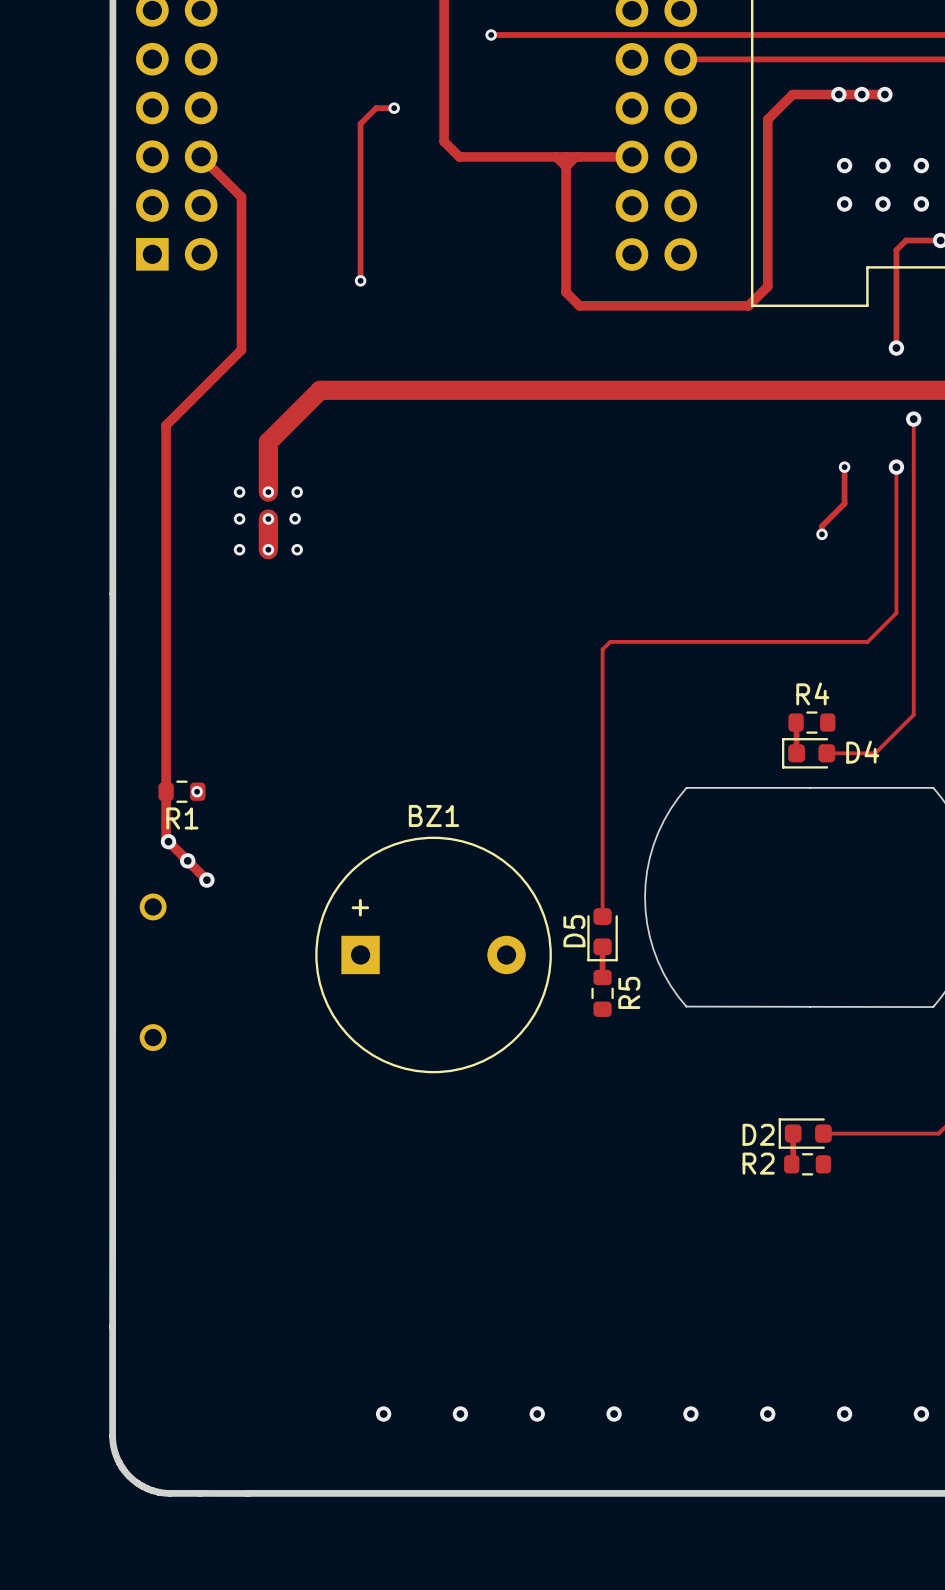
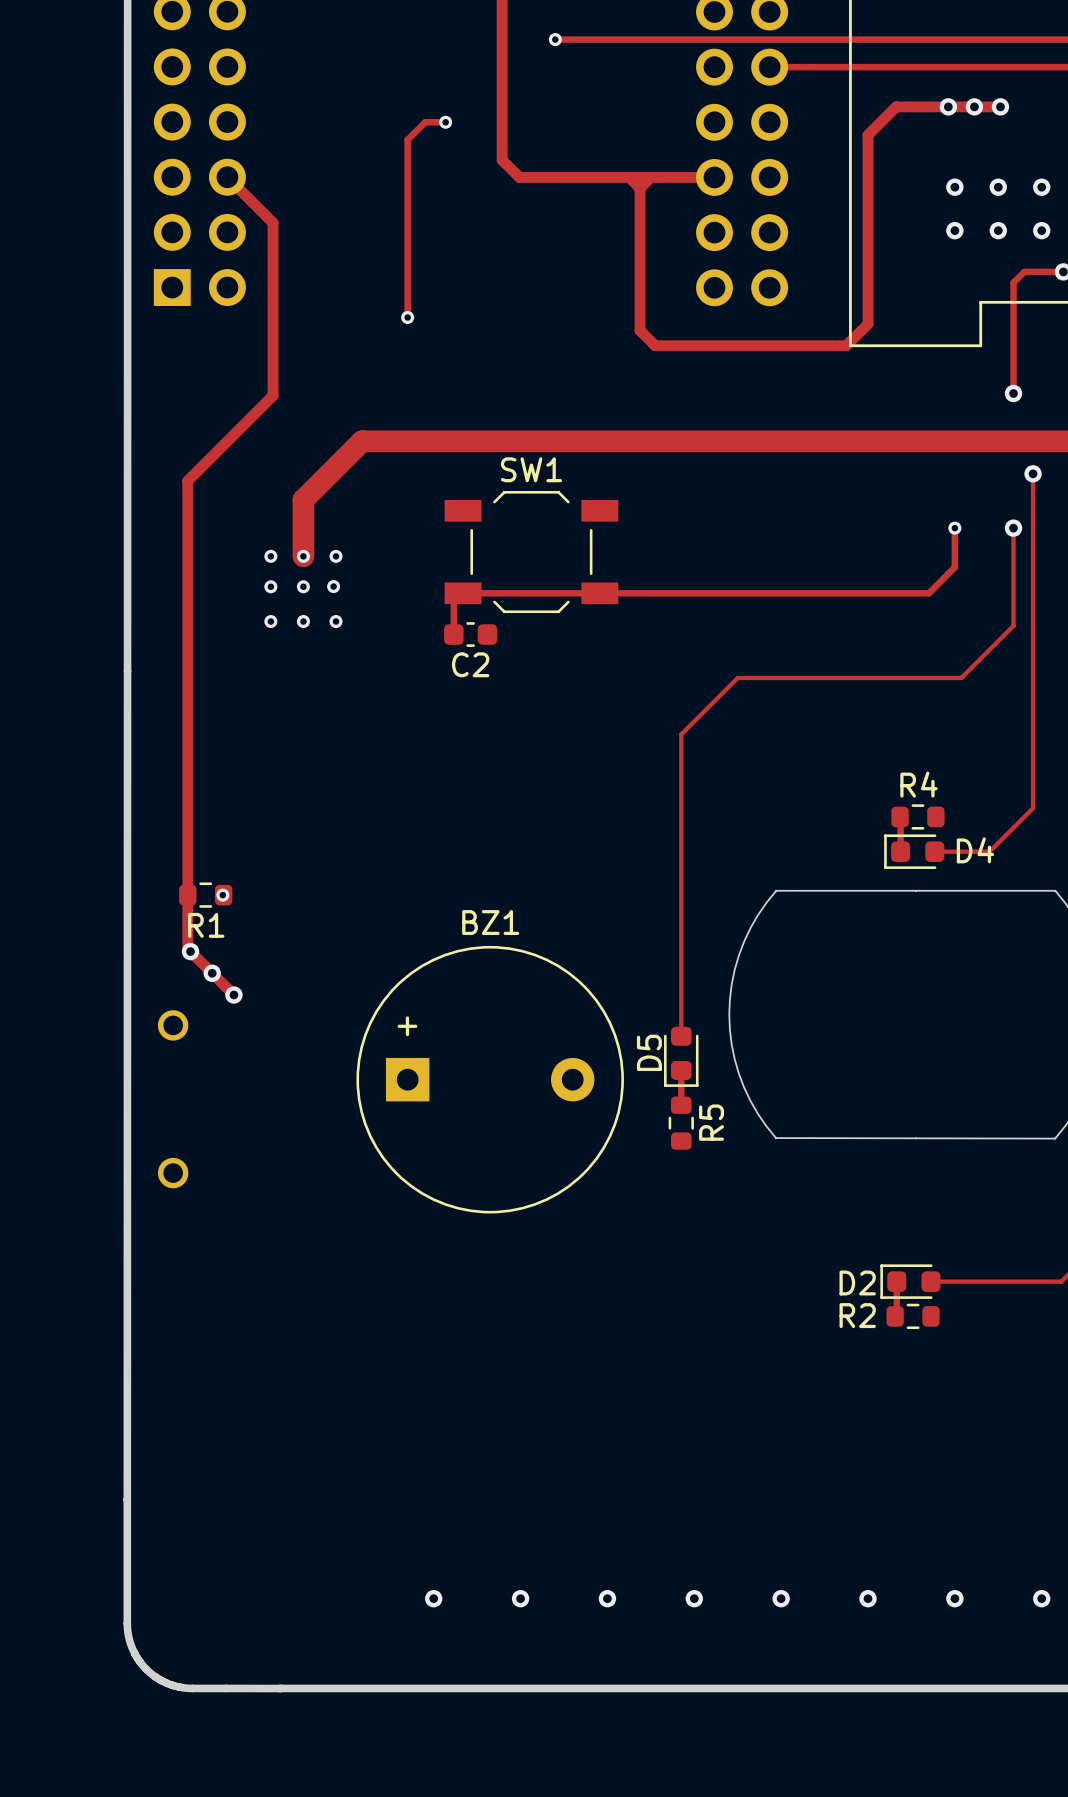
SW1: none -> (531, 552)
track: (844, 501) (822, 526) (822, 534) -> (954, 567) (928, 593) (463, 593) (453, 602) (453, 634)
track: (268, 518) (268, 549) -> none
via: (822, 534) -> none
track: (896, 553) (896, 613) (867, 641) (610, 641) -> (1013, 625) (961, 677) (737, 677) (689, 725)
C2: none -> (470, 634)

